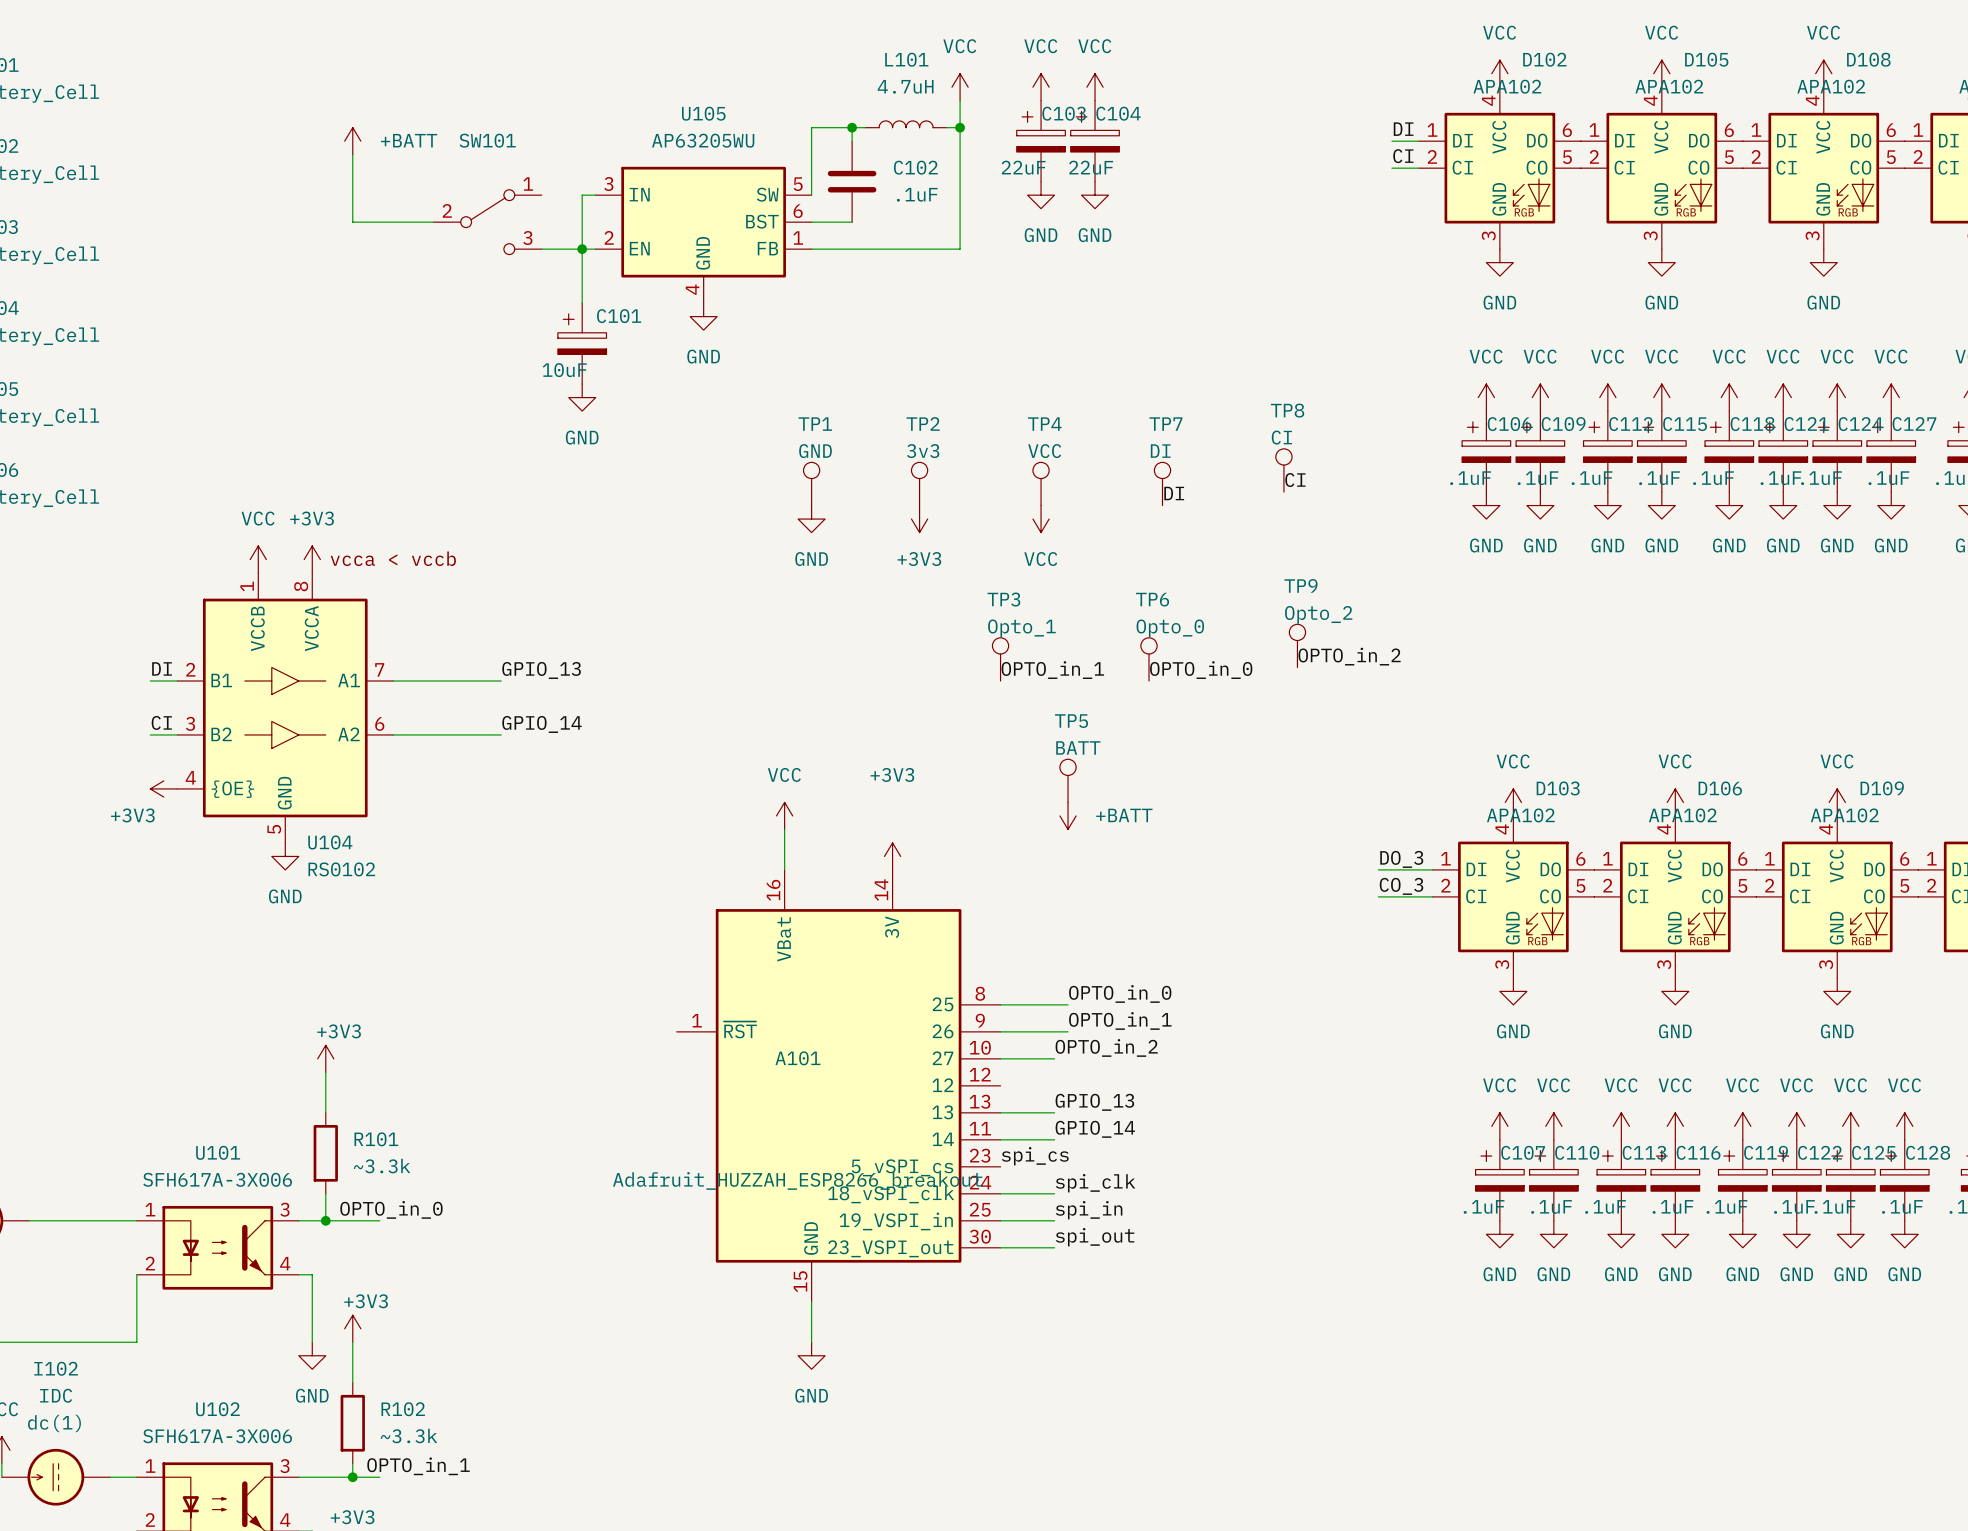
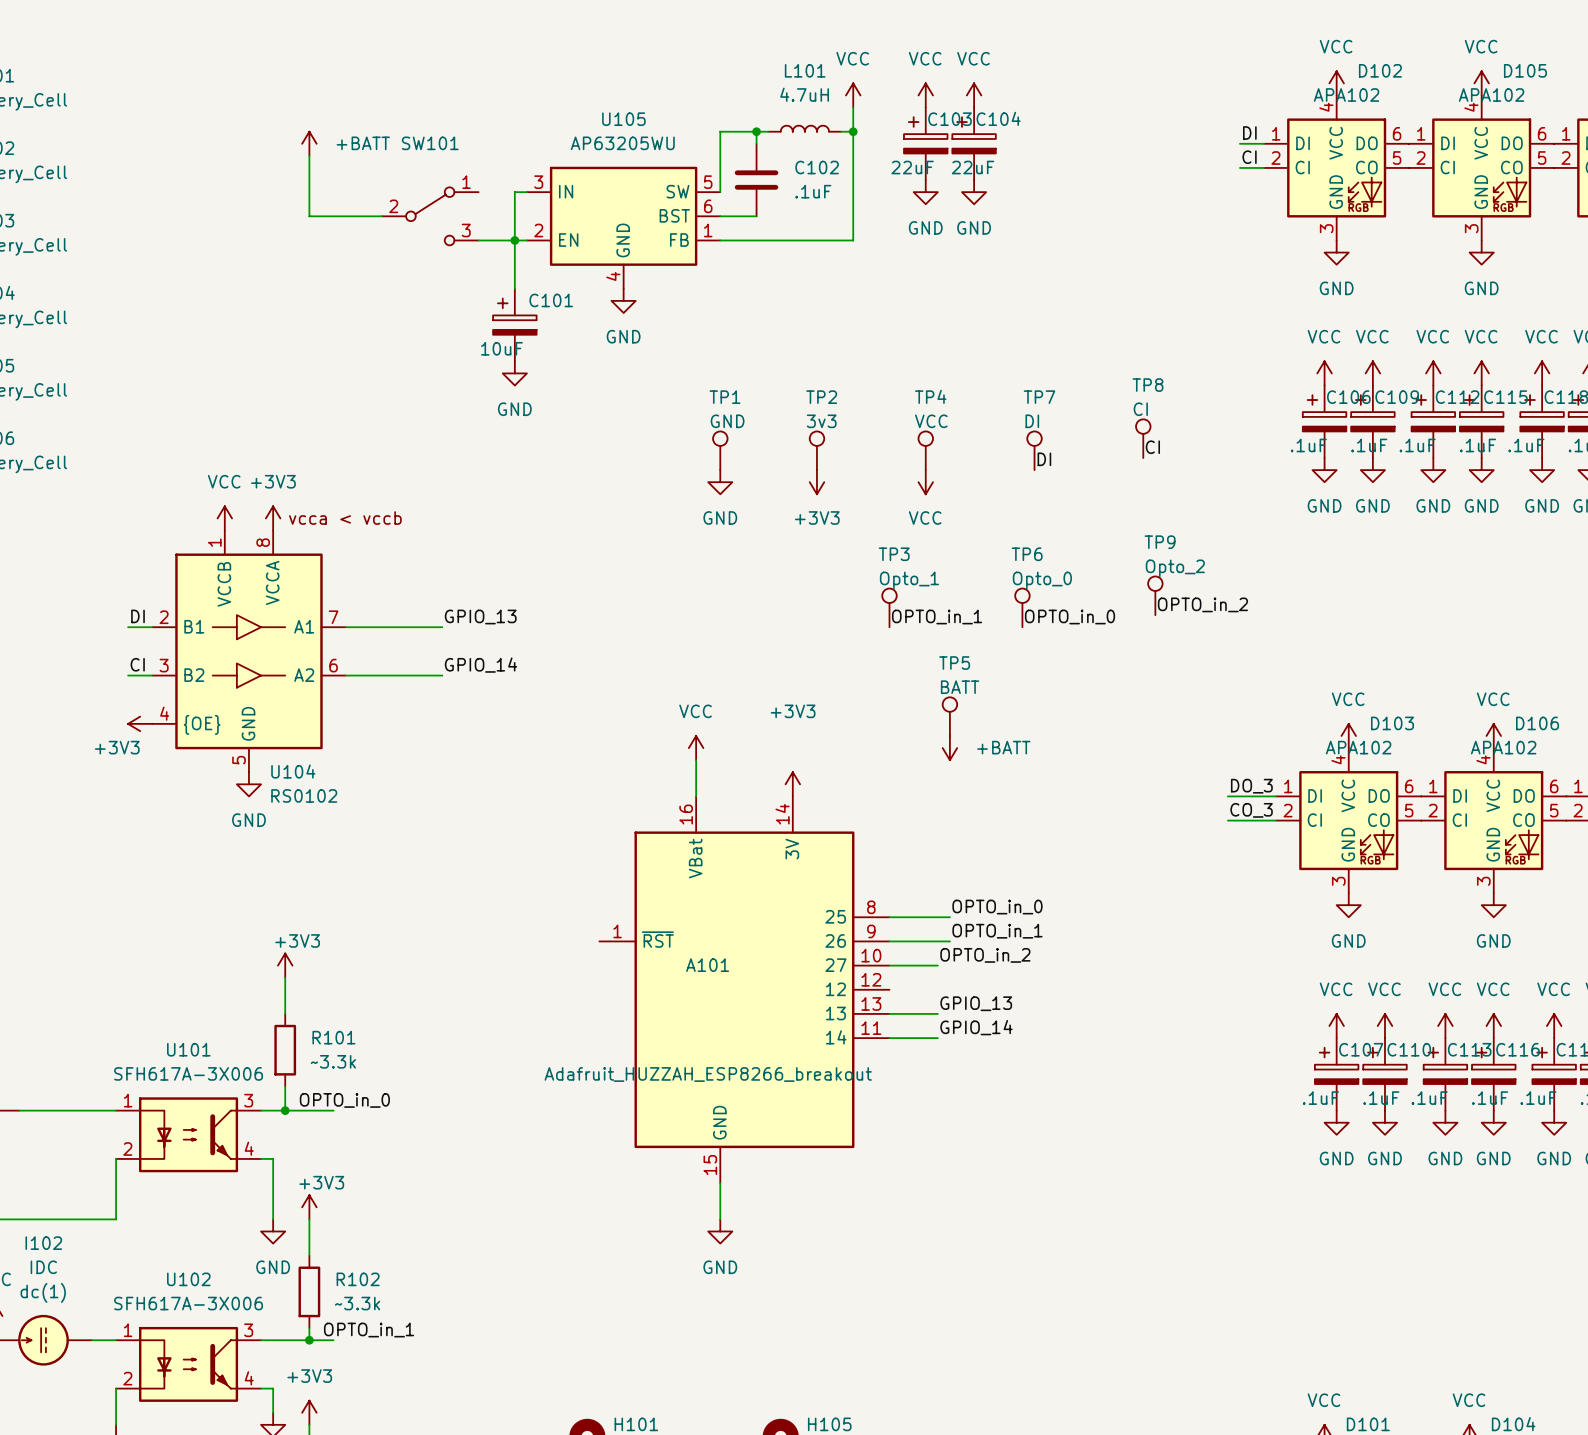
A101 symbol: [676, 869, 1001, 1302] -> [599, 796, 890, 1184]
label: spi_cs (1035, 1156) -> none
label: spi_clk (1095, 1183) -> none
wire: (1000, 1193) (1054, 1193) -> none
label: spi_in (1089, 1210) -> none
wire: (1000, 1220) (1054, 1220) -> none
label: spi_out (1095, 1237) -> none
wire: (1000, 1247) (1054, 1247) -> none

